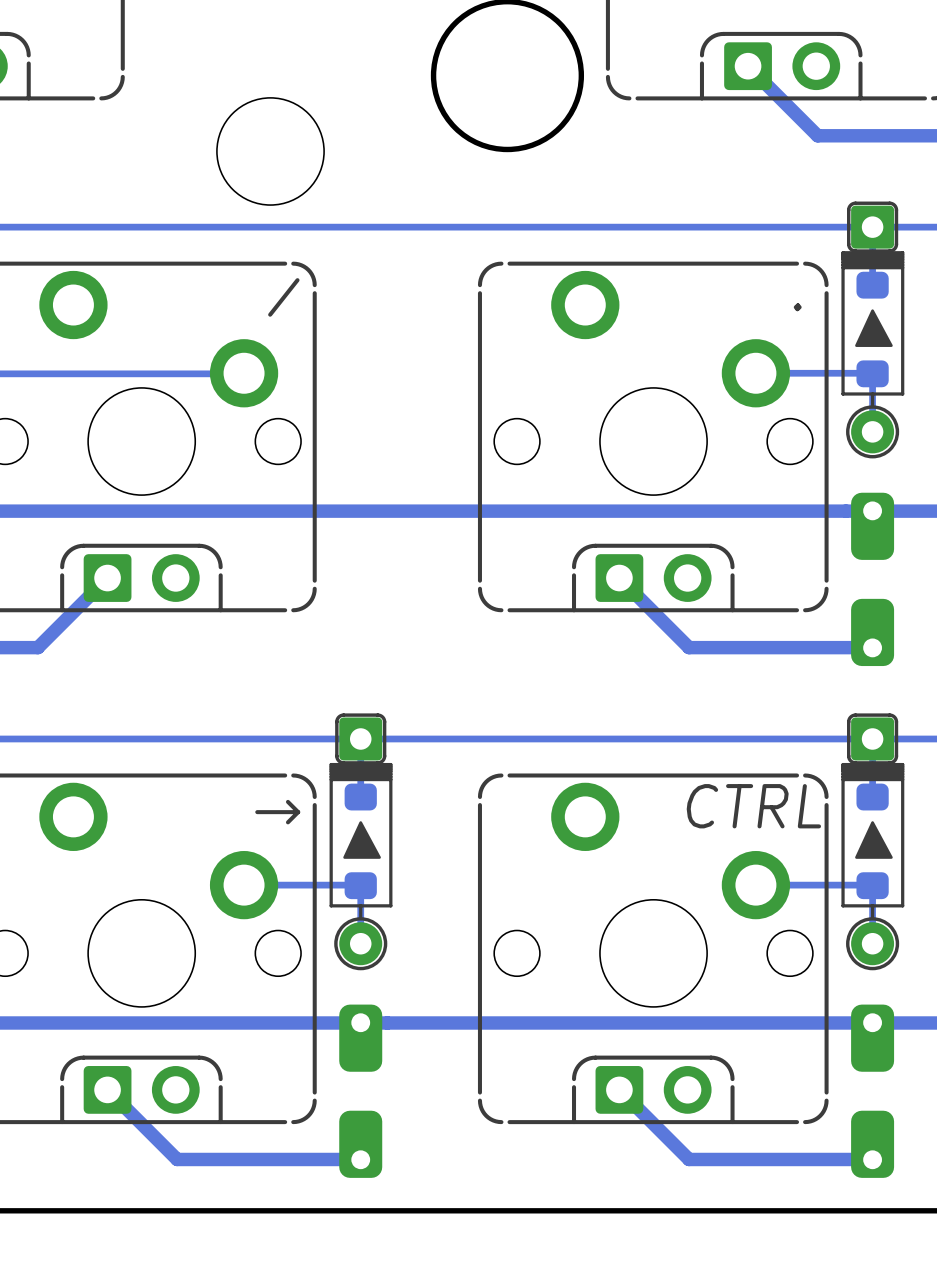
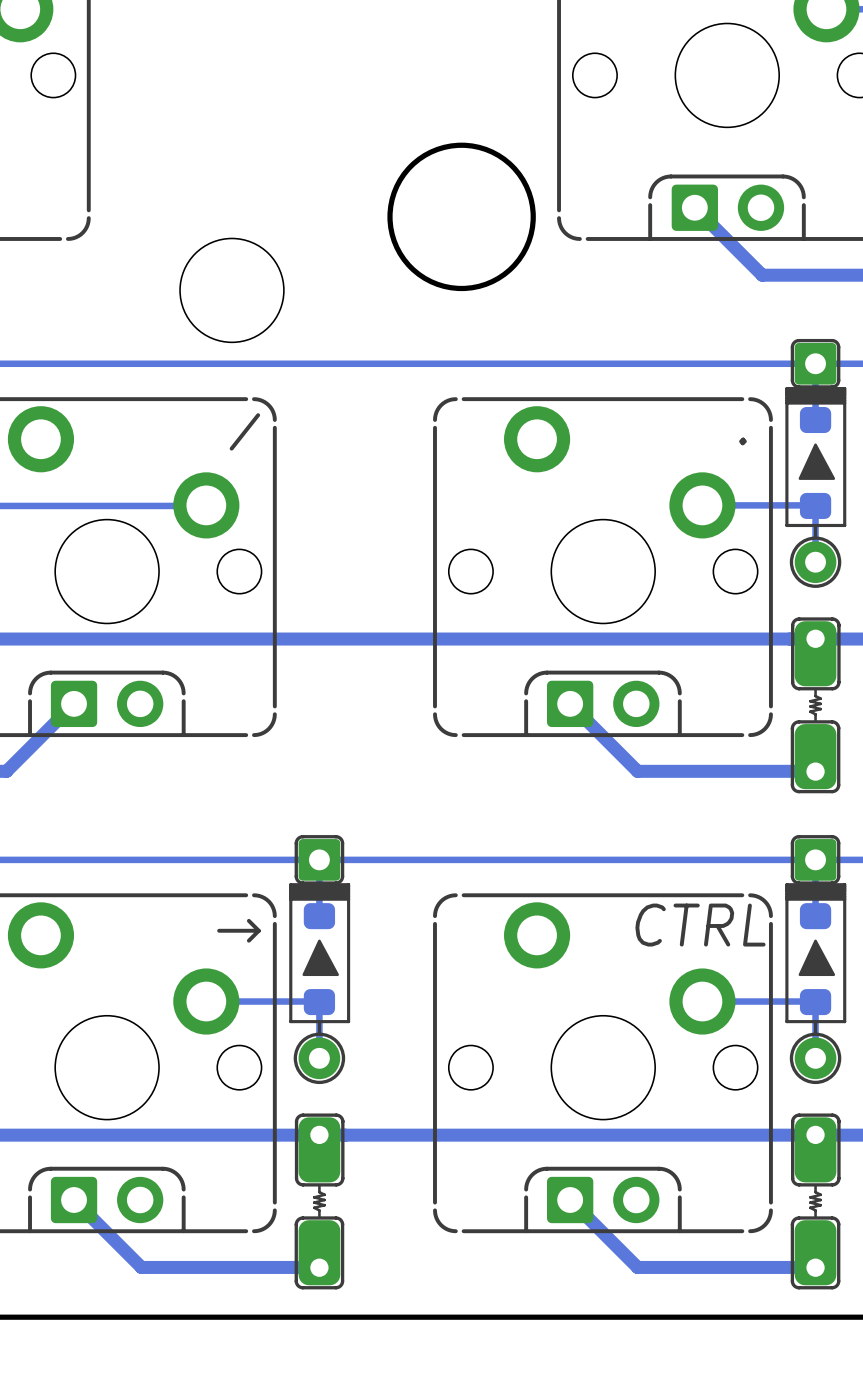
part footprint: [851, 492, 895, 667] -> [790, 617, 841, 794]
part footprint: [339, 1004, 383, 1178] -> [294, 1113, 345, 1290]
part footprint: [851, 1004, 895, 1178] -> [790, 1113, 841, 1290]

